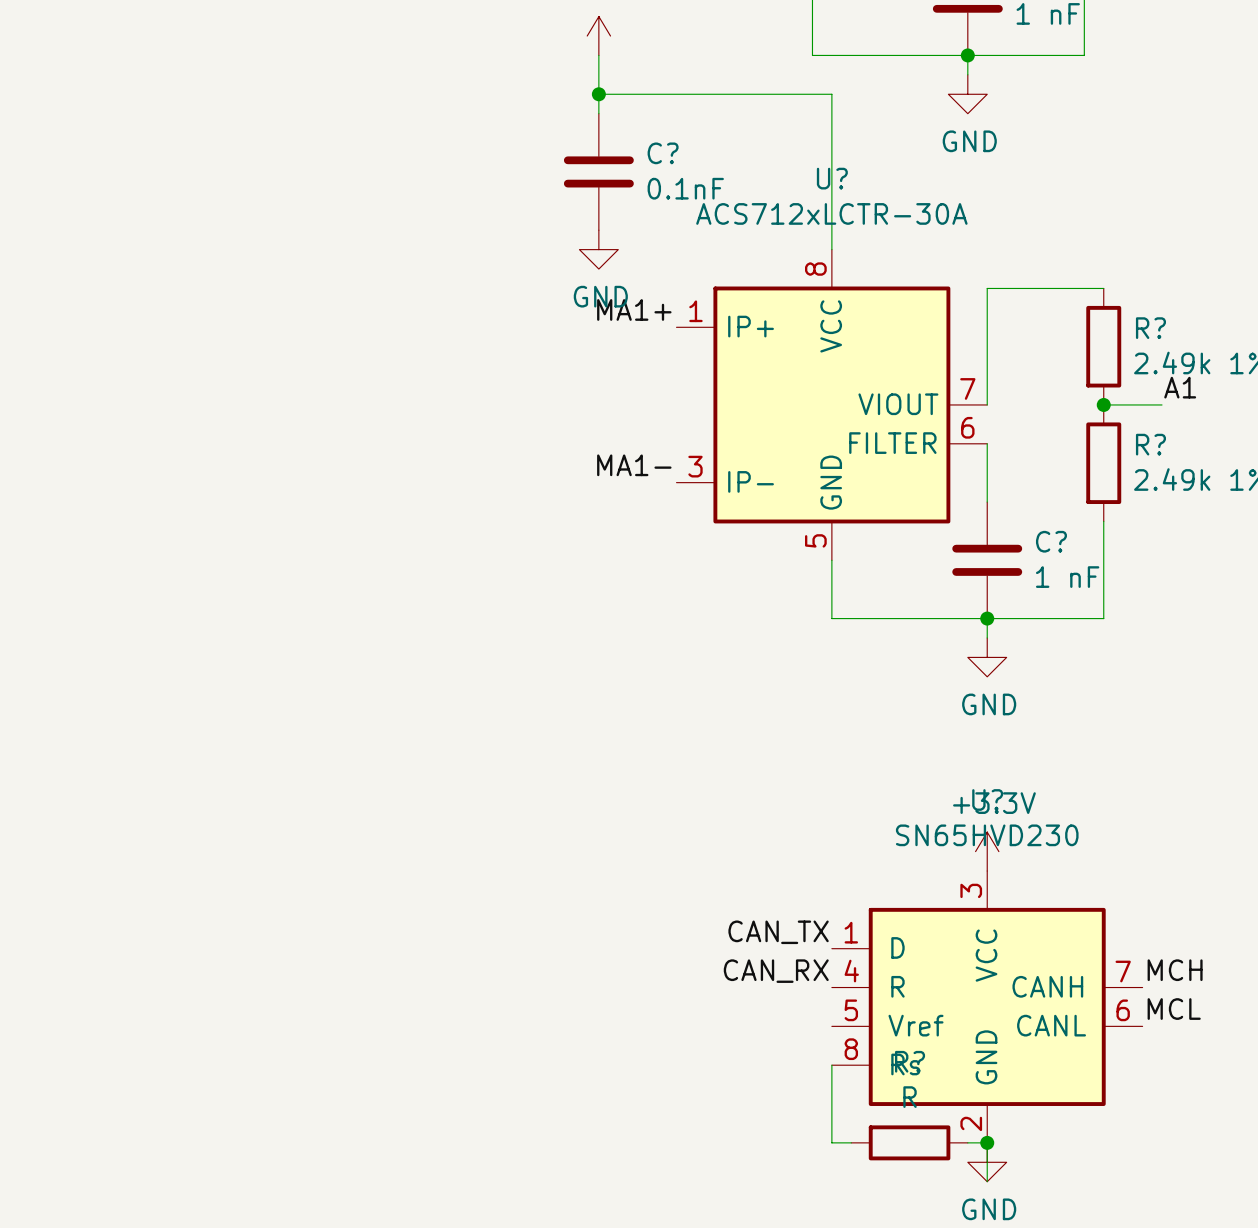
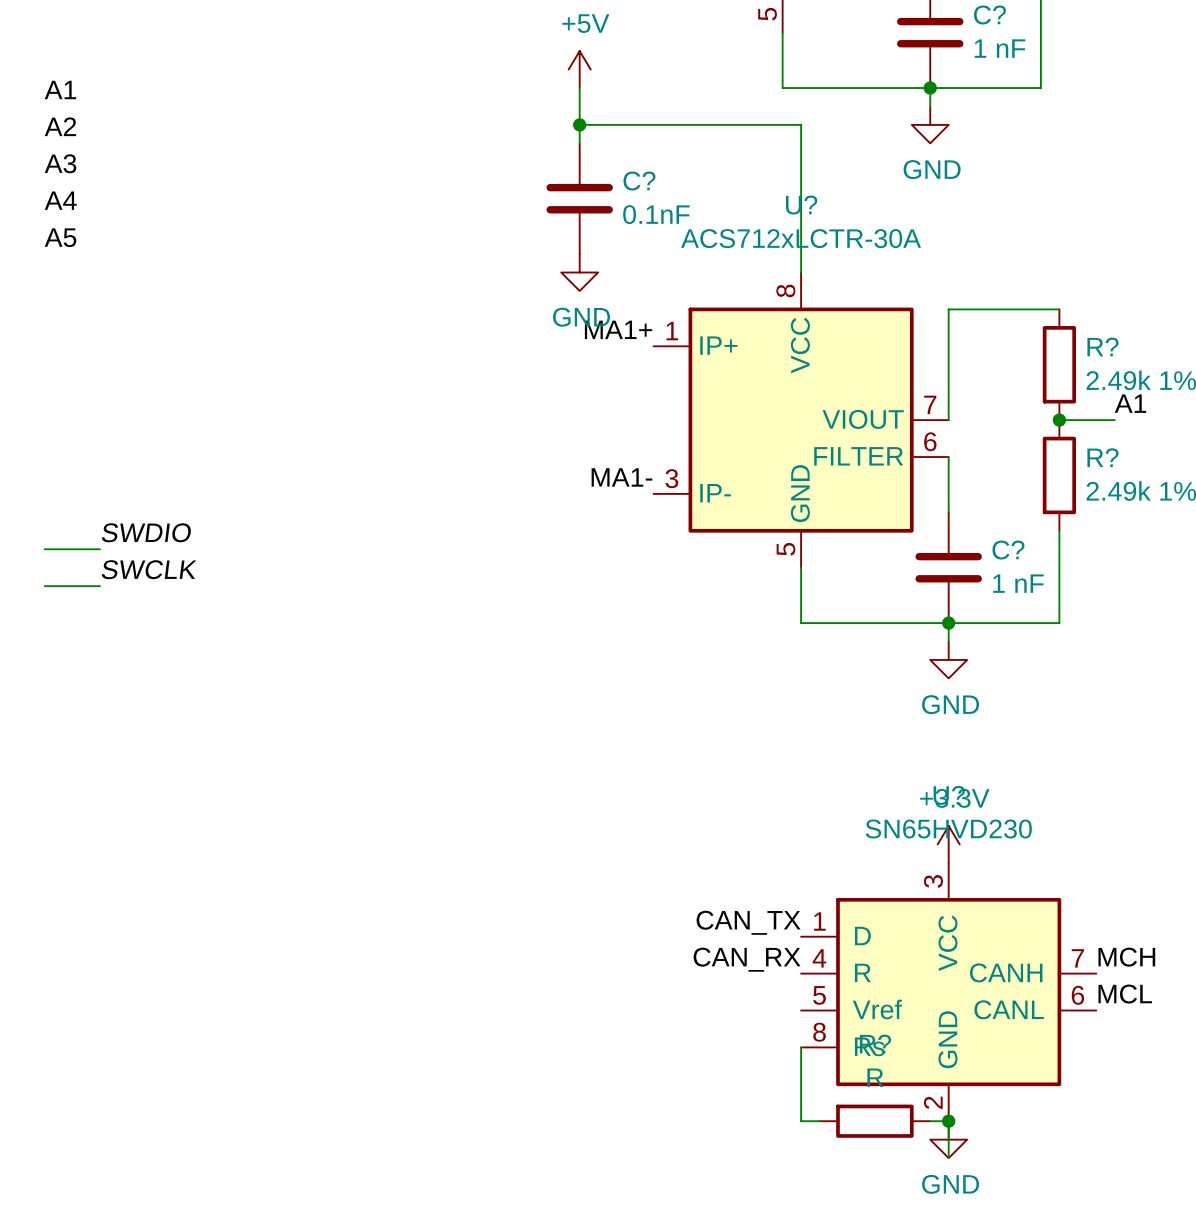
label: none -> A1 (60, 89)
label: none -> A2 (60, 126)
label: none -> A3 (60, 163)
label: none -> A4 (60, 200)
label: none -> A5 (60, 237)
label: none -> SWDIO (146, 532)
wire: none -> (44, 549) (99, 549)
label: none -> SWCLK (149, 569)
wire: none -> (44, 586) (99, 586)

